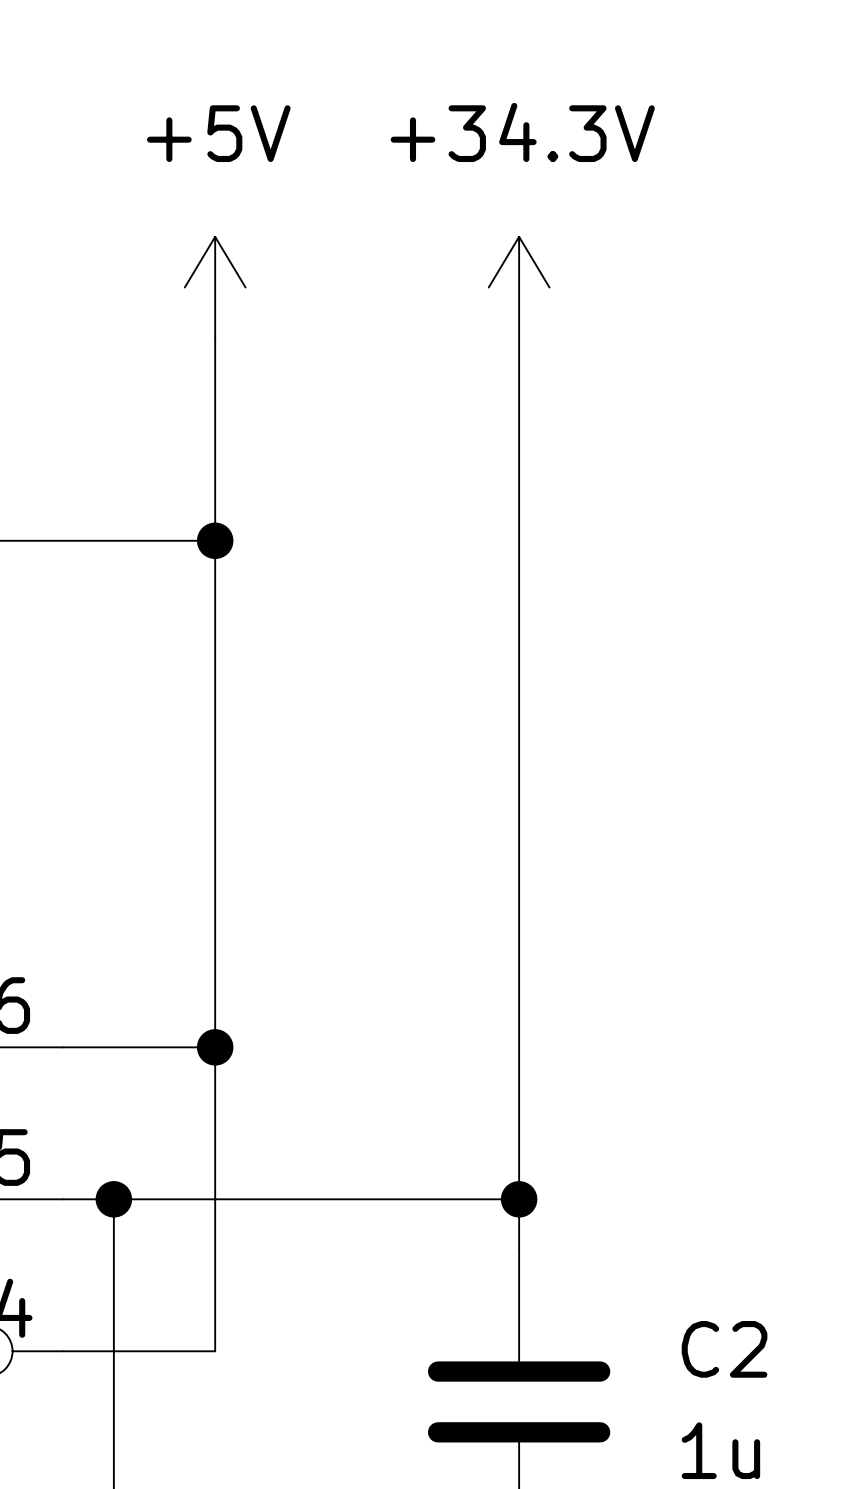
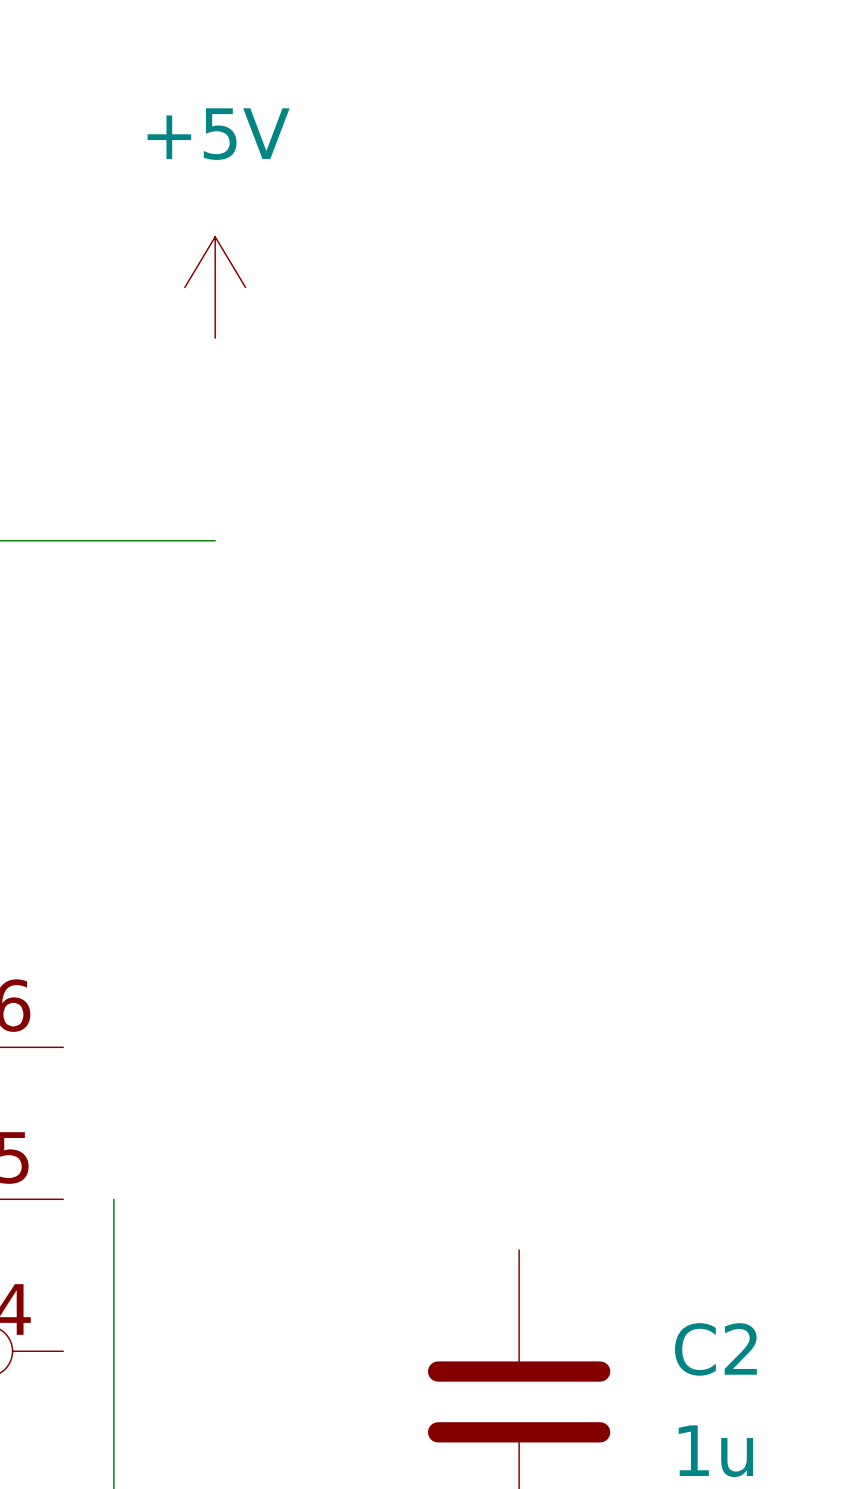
power symbol: +34.3V (519, 287) -> none
wire: (215, 338) (215, 1351) (63, 1351) -> none
wire: (519, 338) (519, 1249) -> none
junction: (215, 540) -> none
wire: (63, 1047) (215, 1047) -> none
junction: (215, 1047) -> none
wire: (63, 1199) (519, 1199) -> none
junction: (113, 1199) -> none
junction: (519, 1199) -> none

